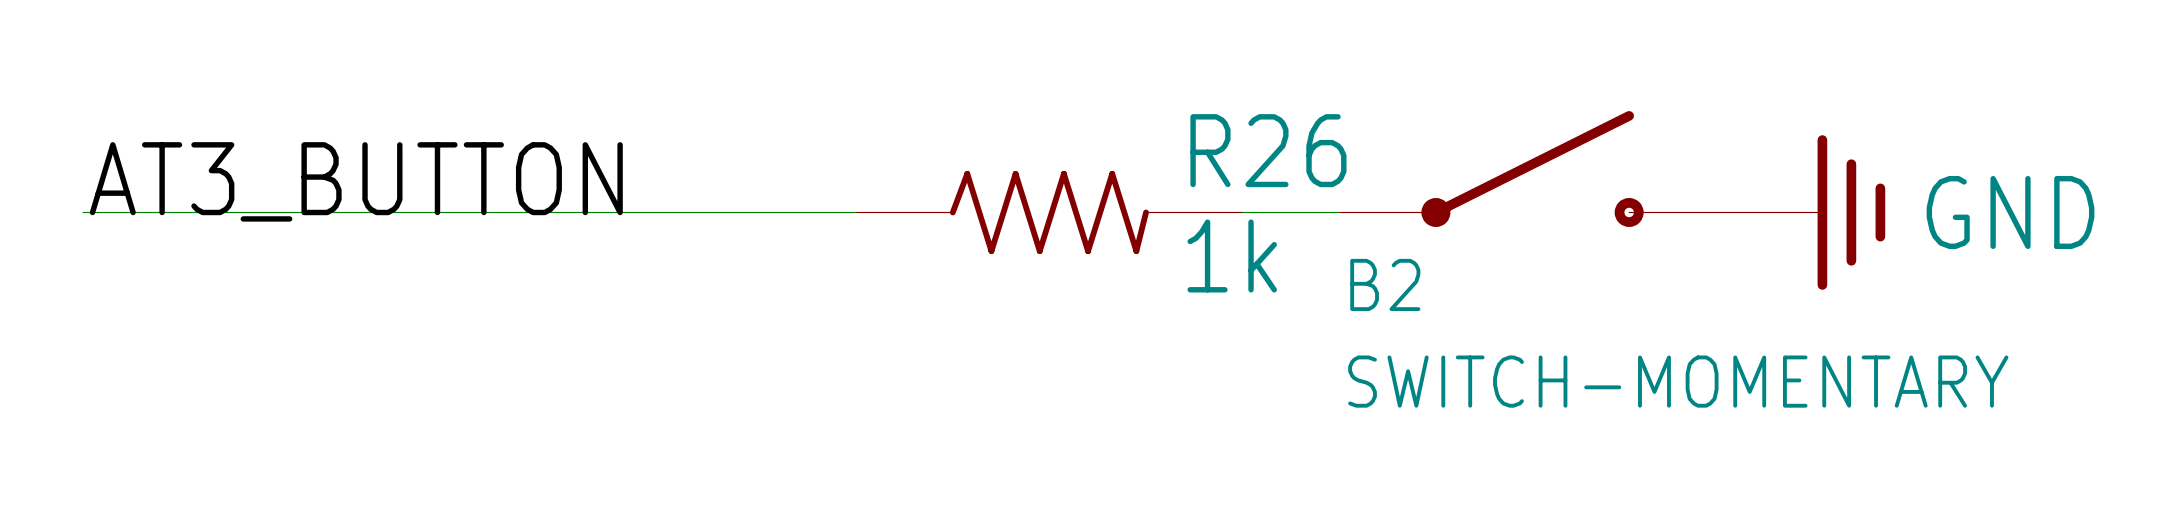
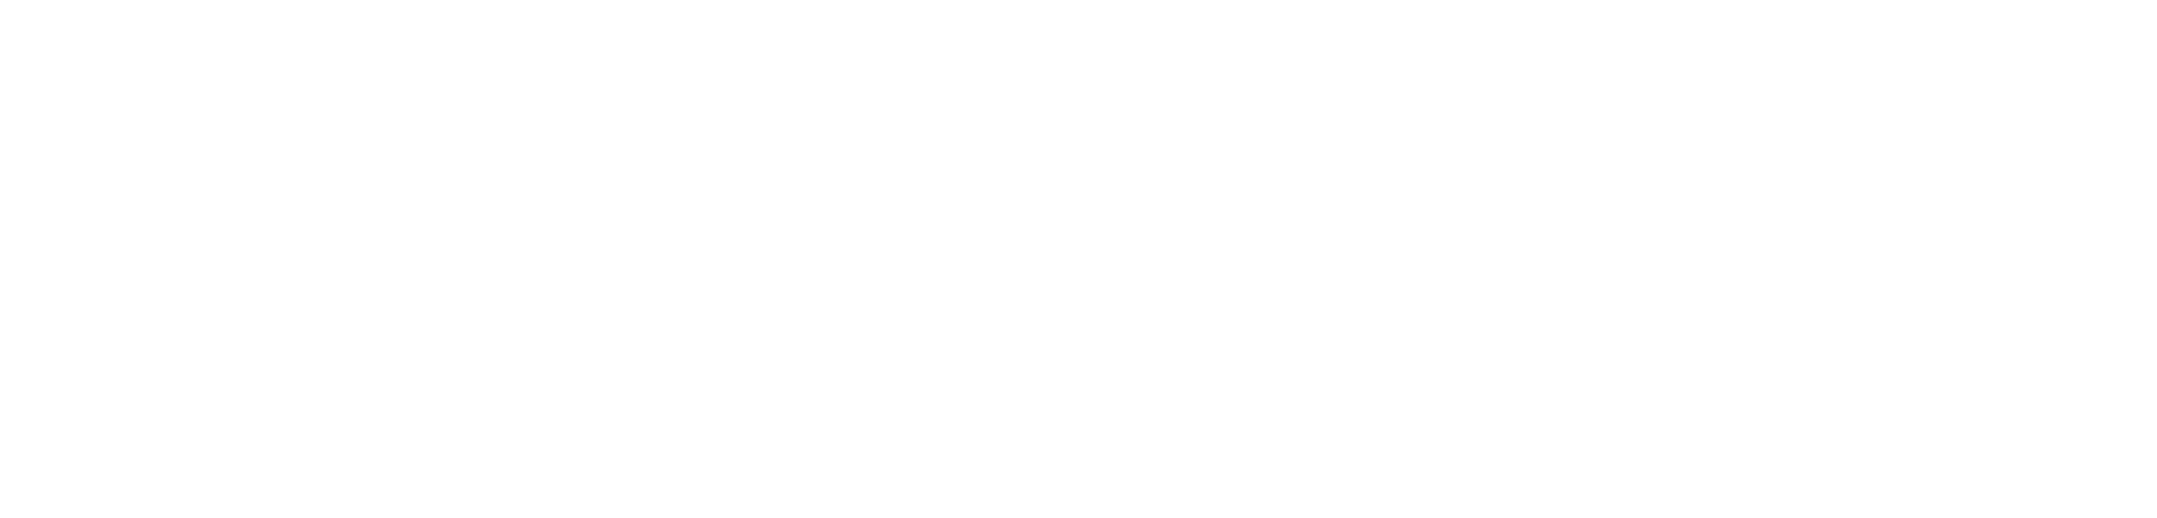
B2: SWITCH-MOMENTARY (1532, 169) -> none
label: AT3_BUTTON (356, 181) -> none
wire: (83, 212) (856, 212) -> none
R26: 1k (1049, 212) -> none
wire: (1242, 212) (1339, 212) -> none
power symbol: GND (1805, 212) -> none

